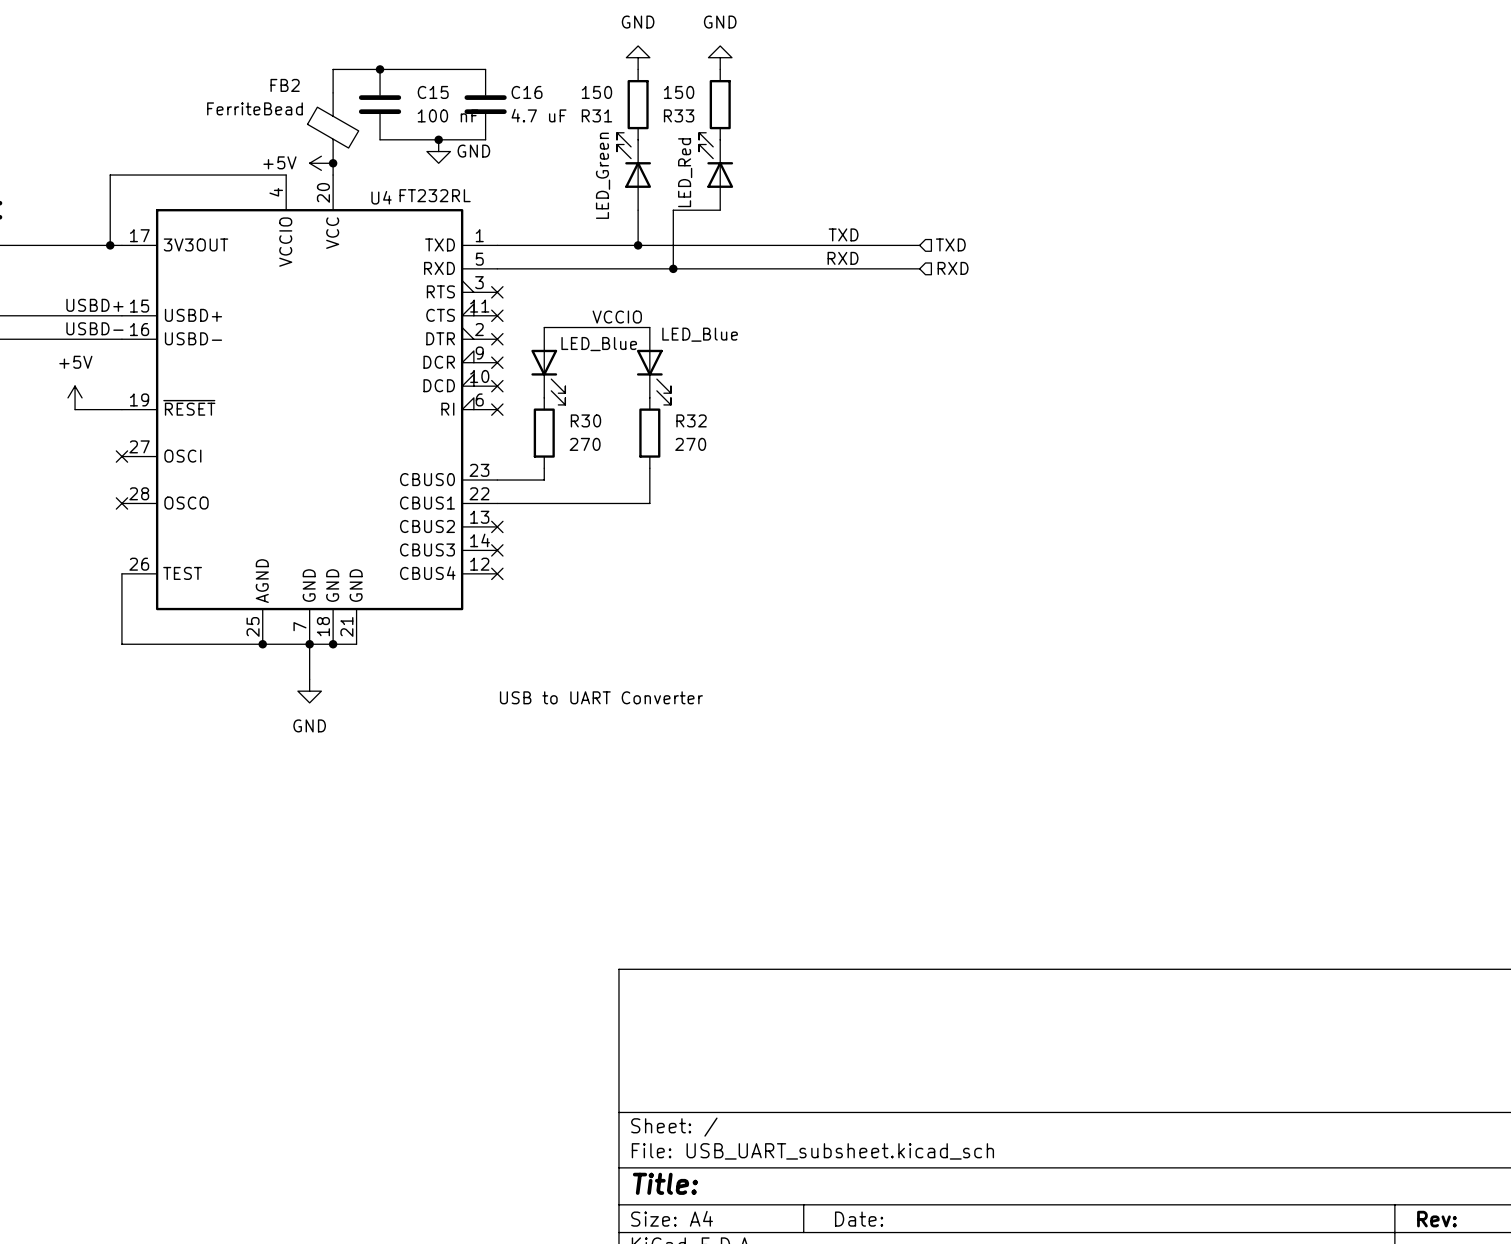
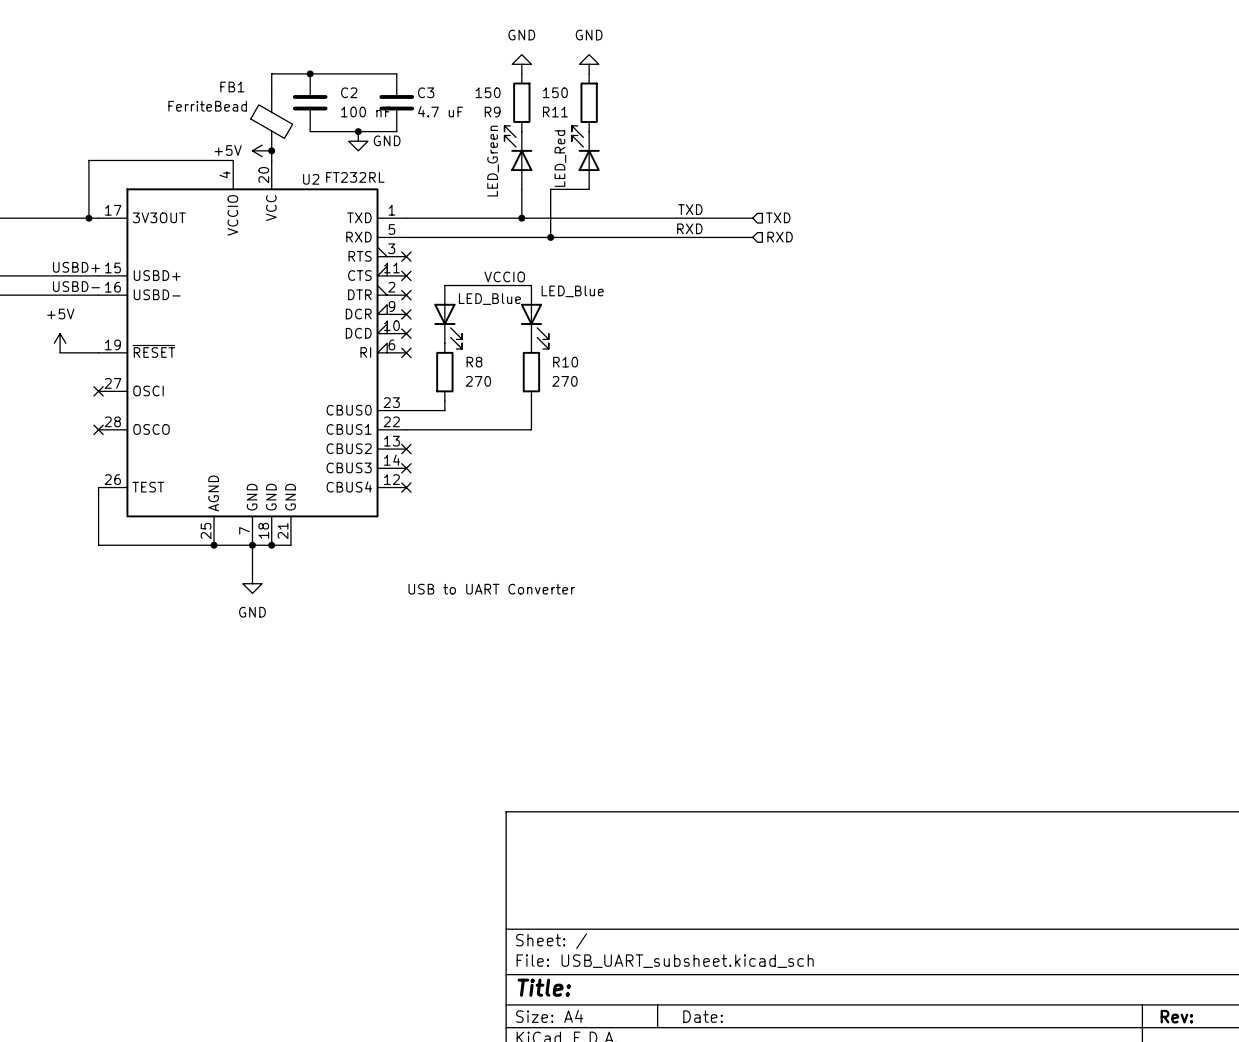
FB2 name: FB2 (285, 85) -> FB1 (232, 87)
C15 name: C15 (433, 92) -> C2 (349, 92)
C16 name: C16 (527, 92) -> C3 (426, 92)
R31 name: R31 (596, 115) -> R9 (492, 112)
R33 name: R33 (679, 115) -> R11 (555, 112)
U4 name: U4 (381, 197) -> U2 (311, 179)
R30 name: R30 (585, 420) -> R8 (474, 362)
R32 name: R32 (691, 420) -> R10 (565, 362)

